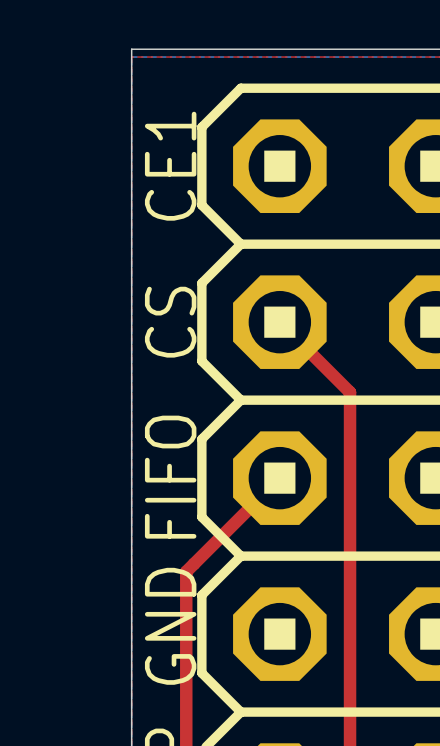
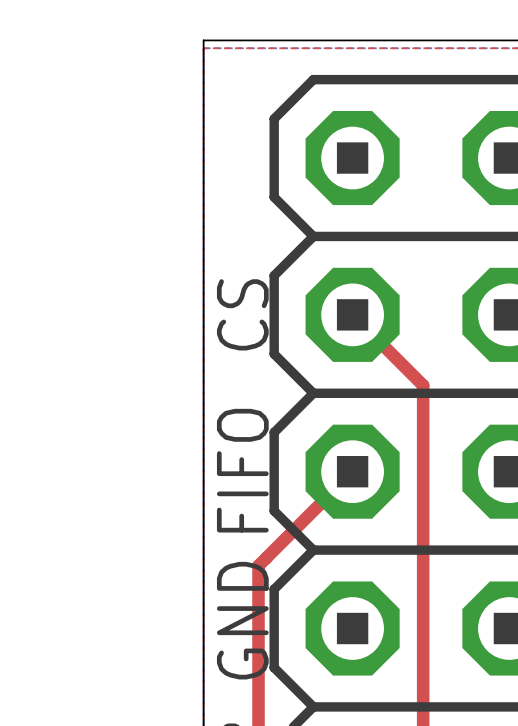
text: CE1 (170, 166) -> none

